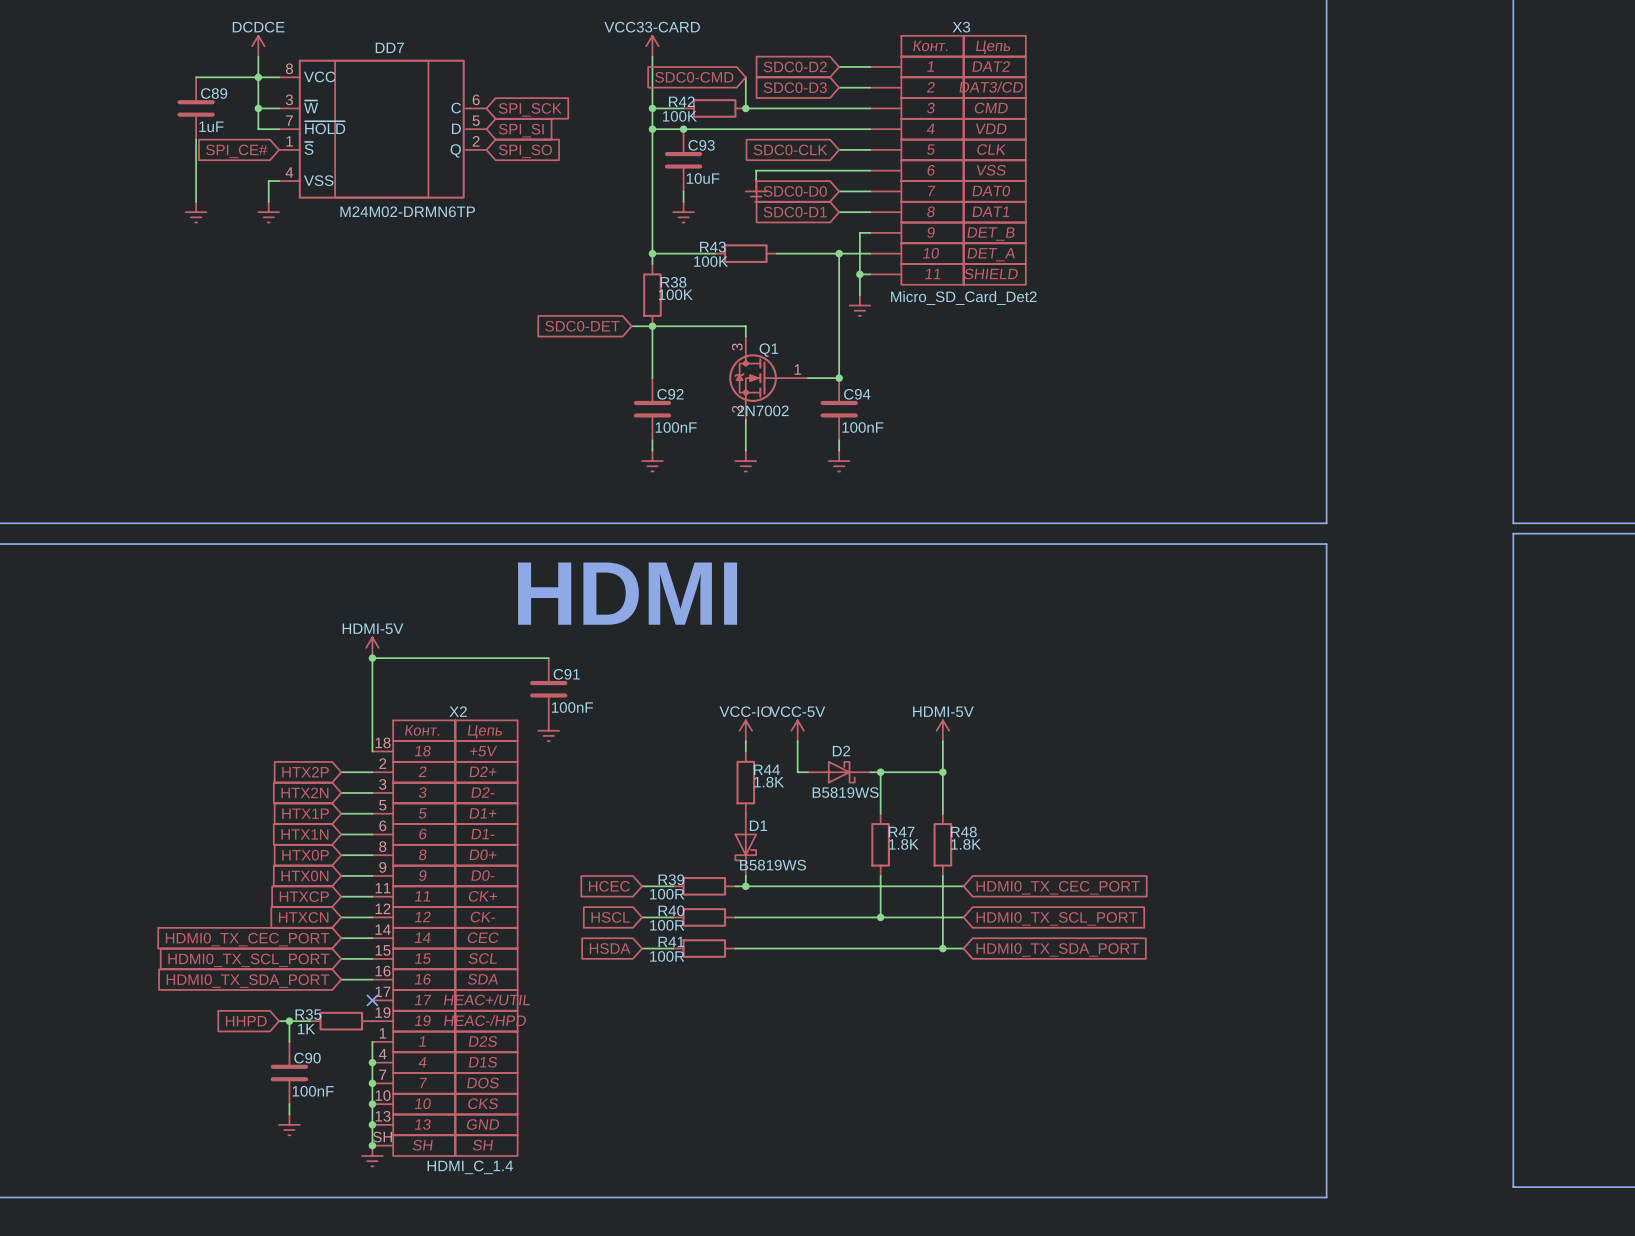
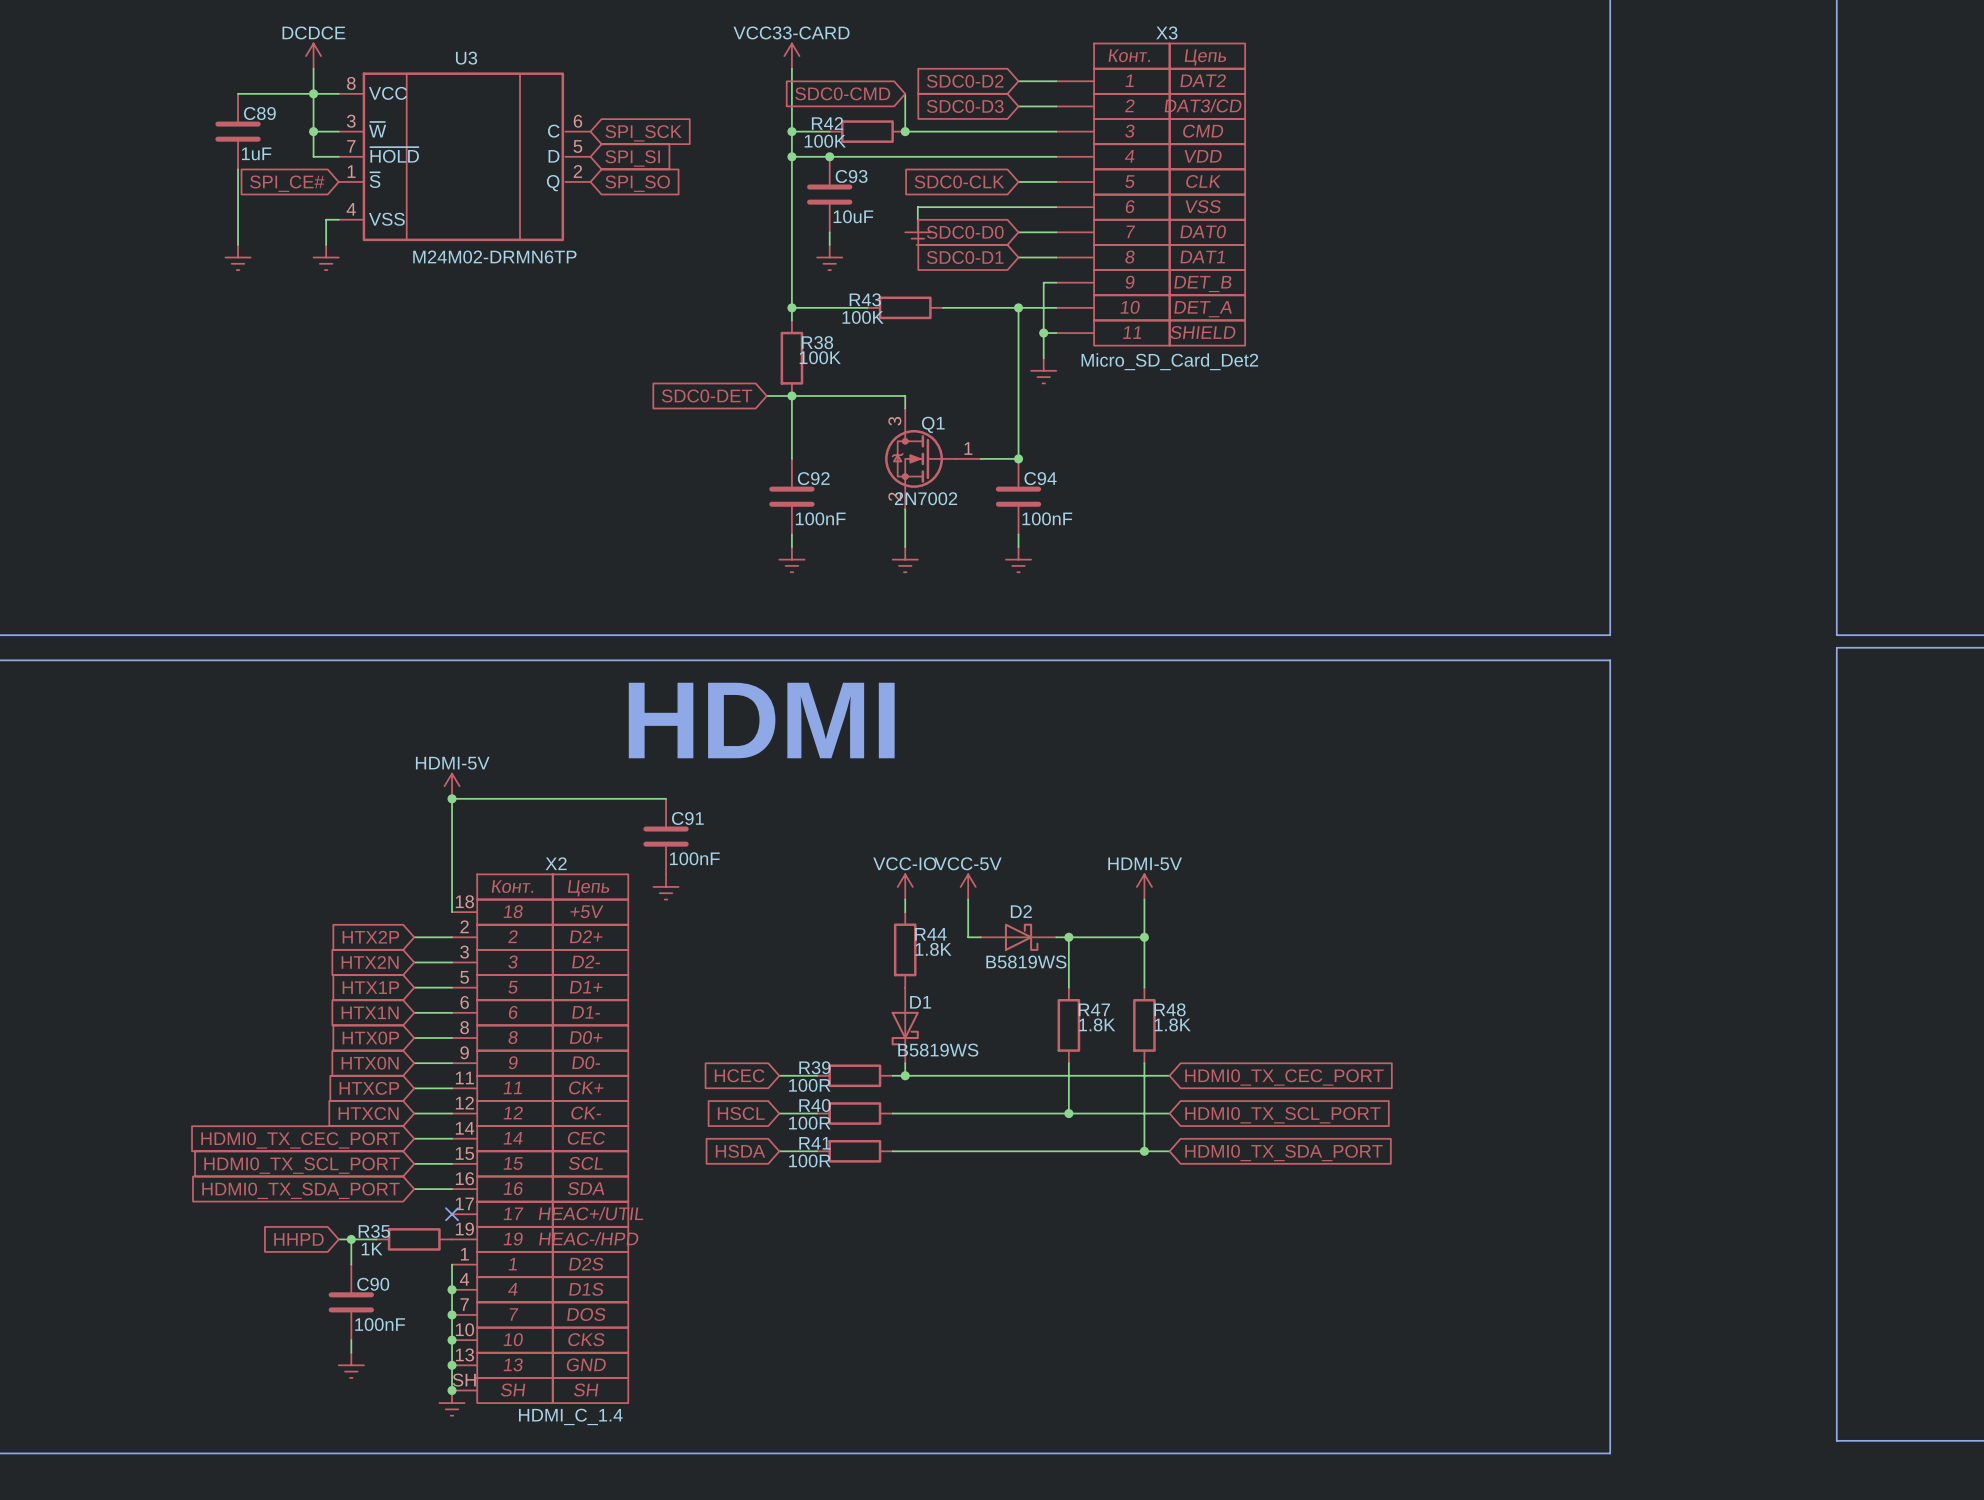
DD7 name: DD7 (389, 47) -> U3 (466, 58)

